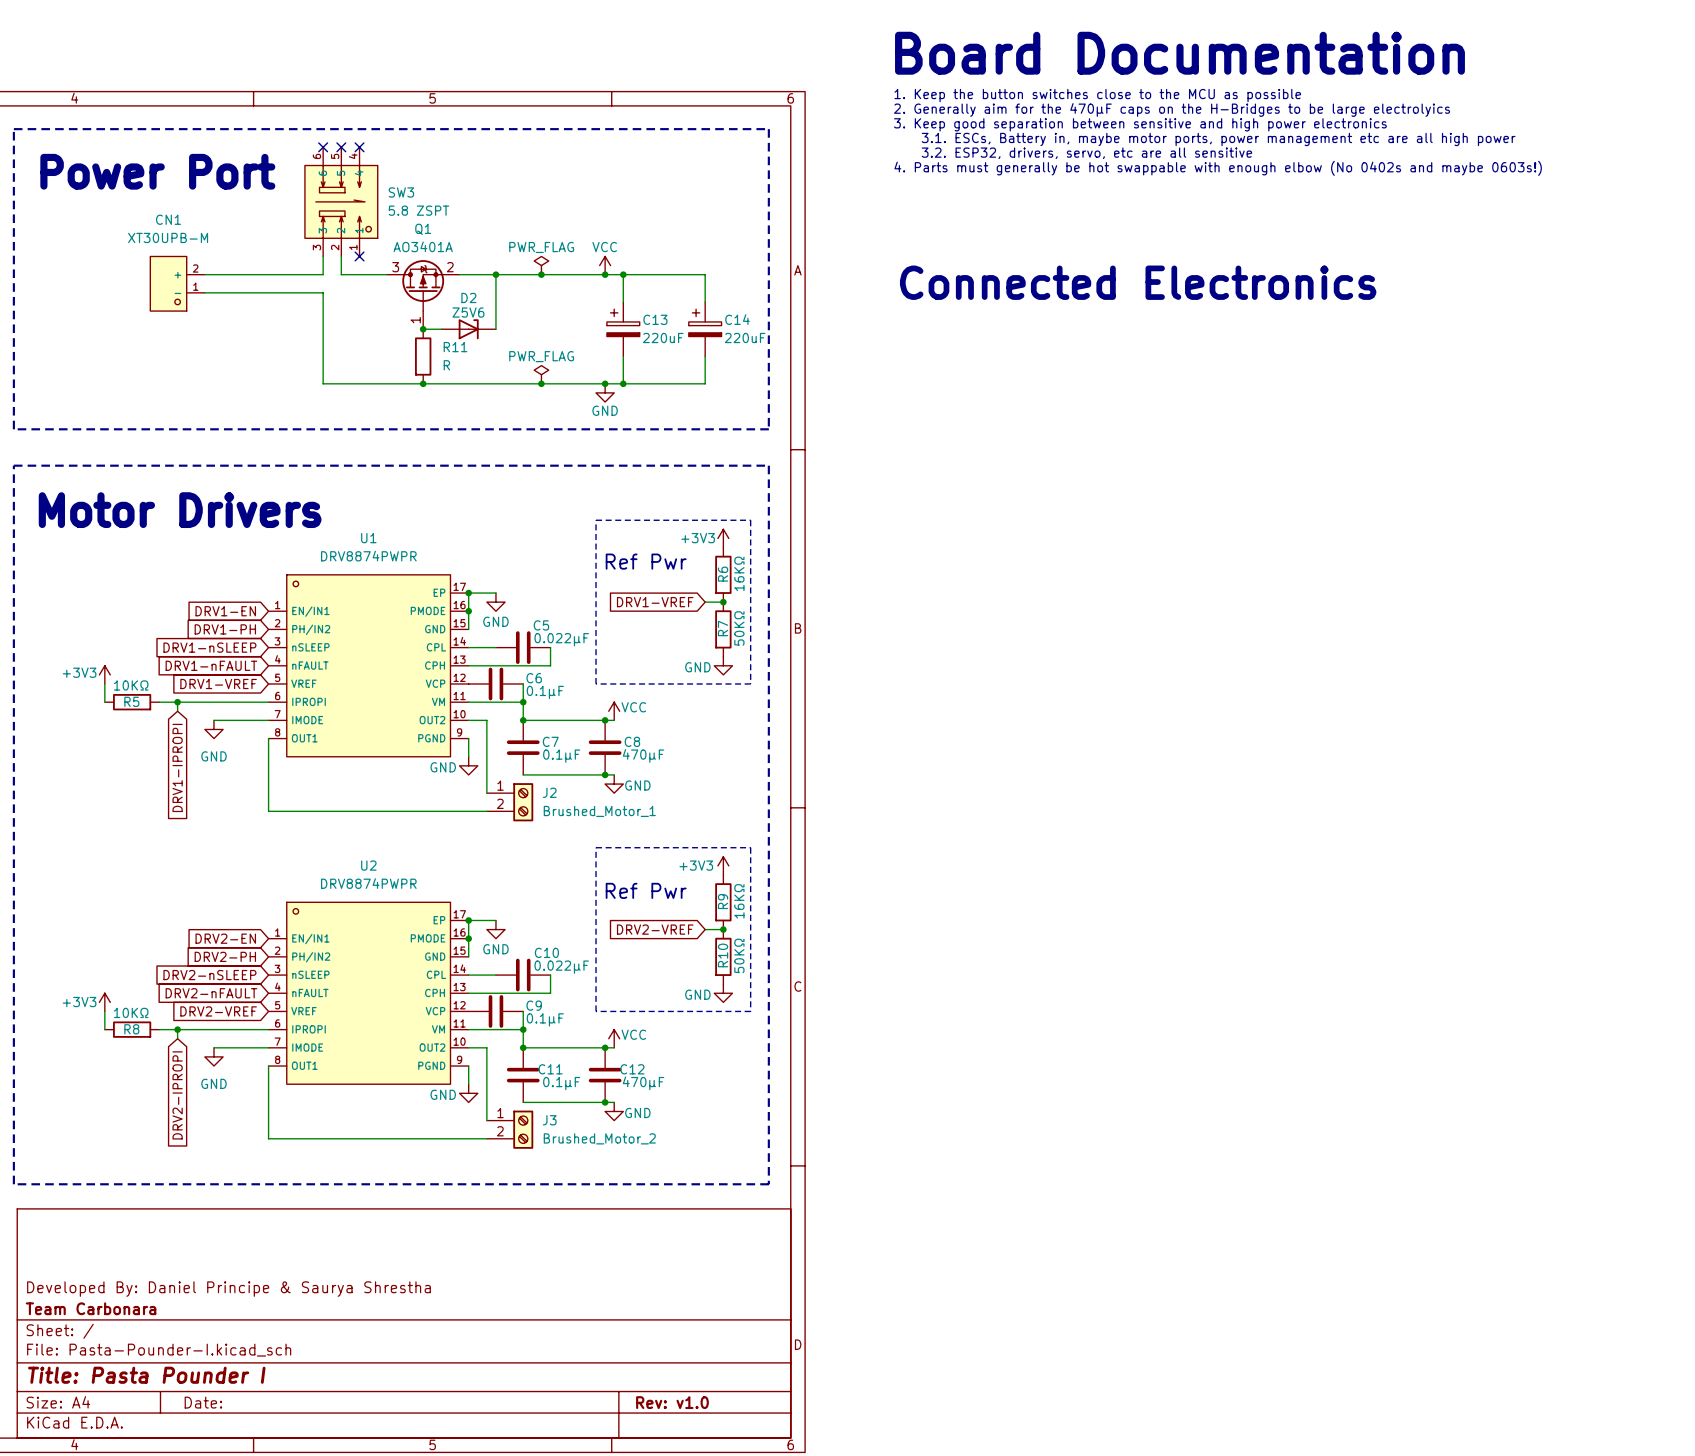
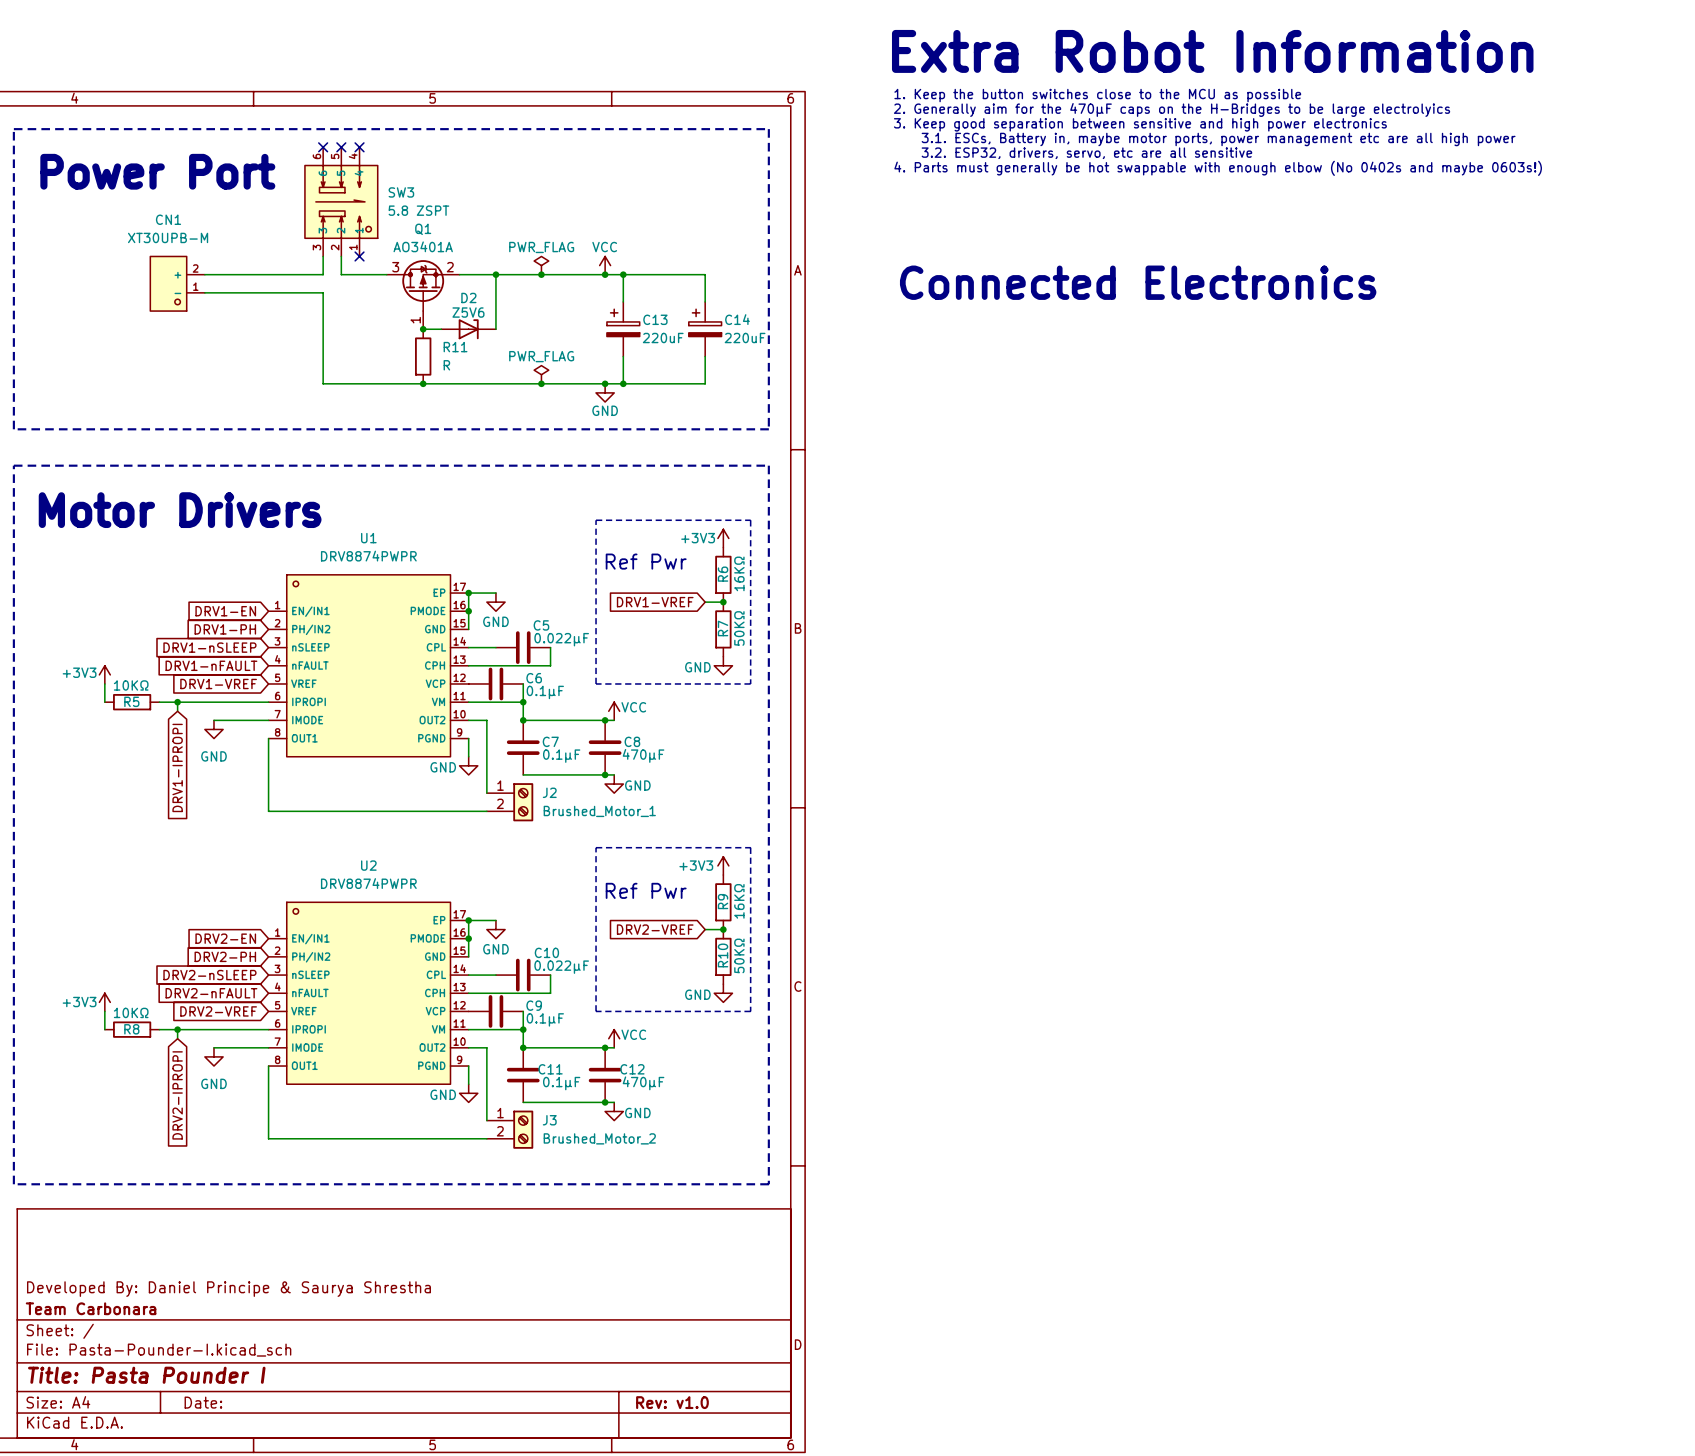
text: none -> Extra Robot Information (1212, 51)
text: Board Documentation (1179, 53) -> none

